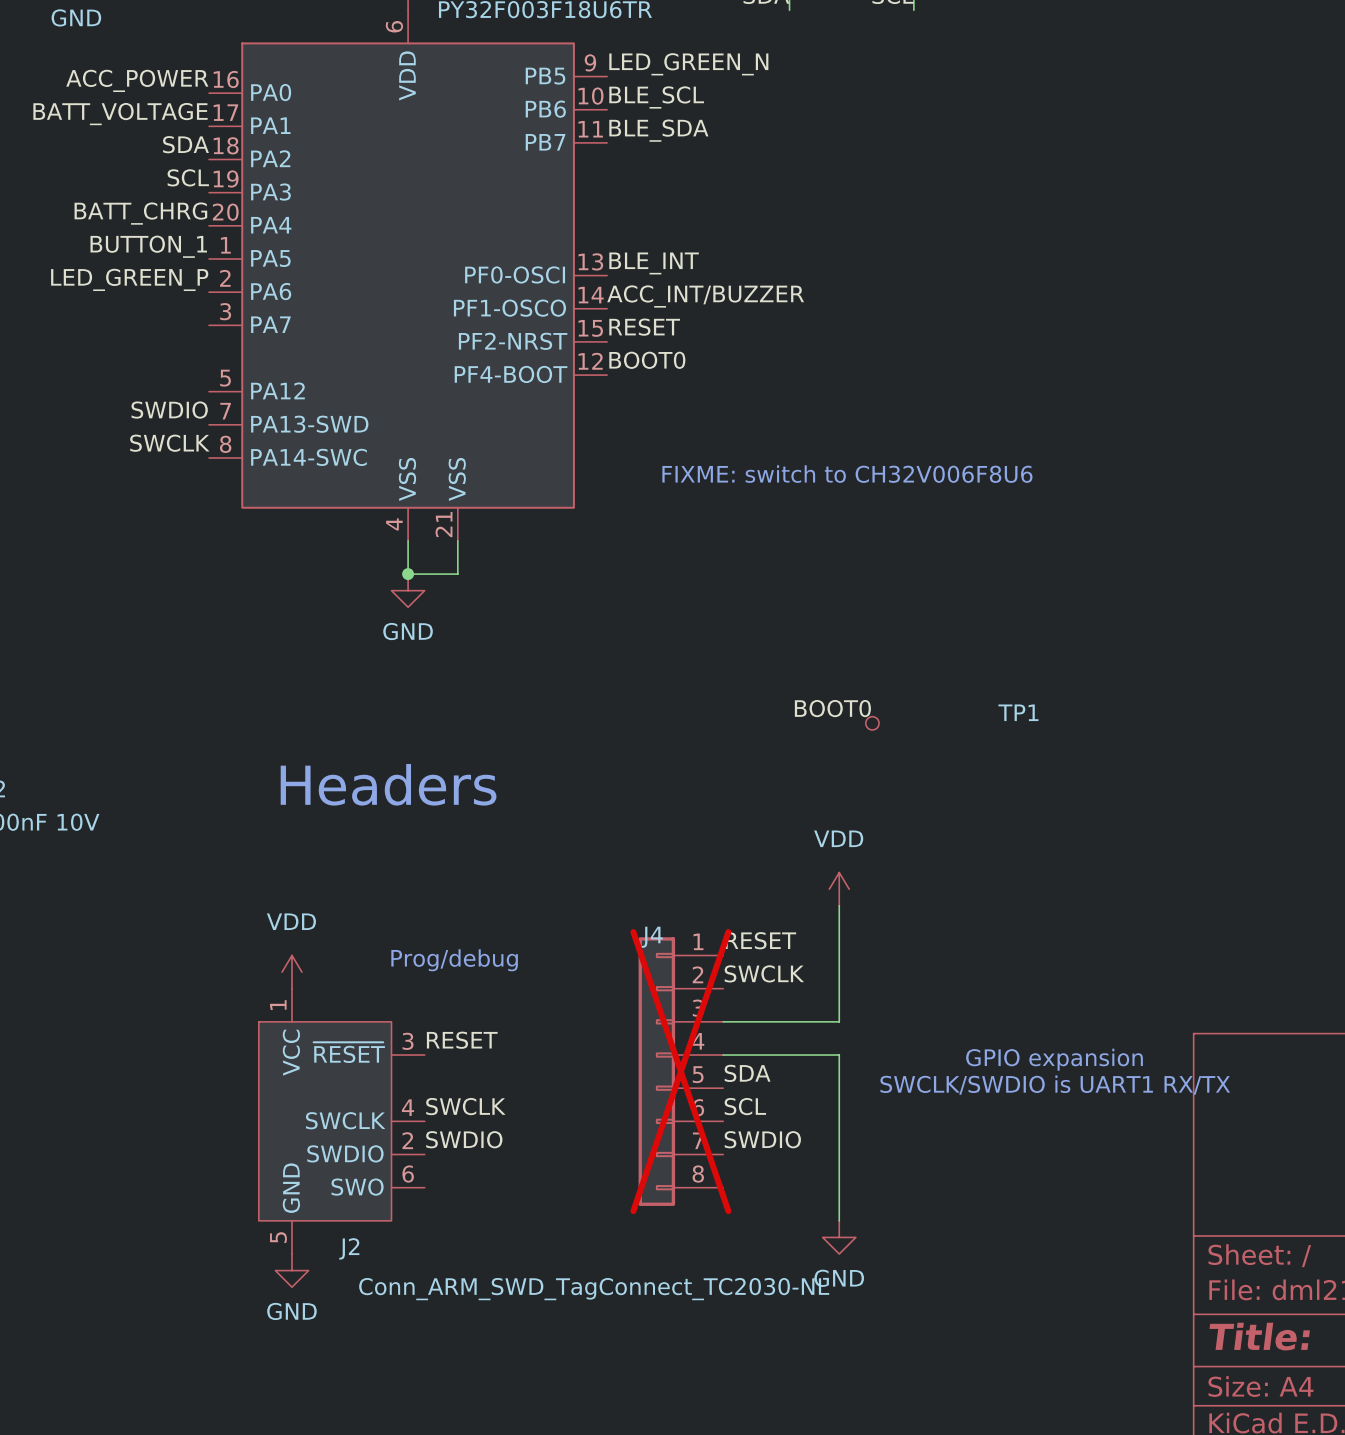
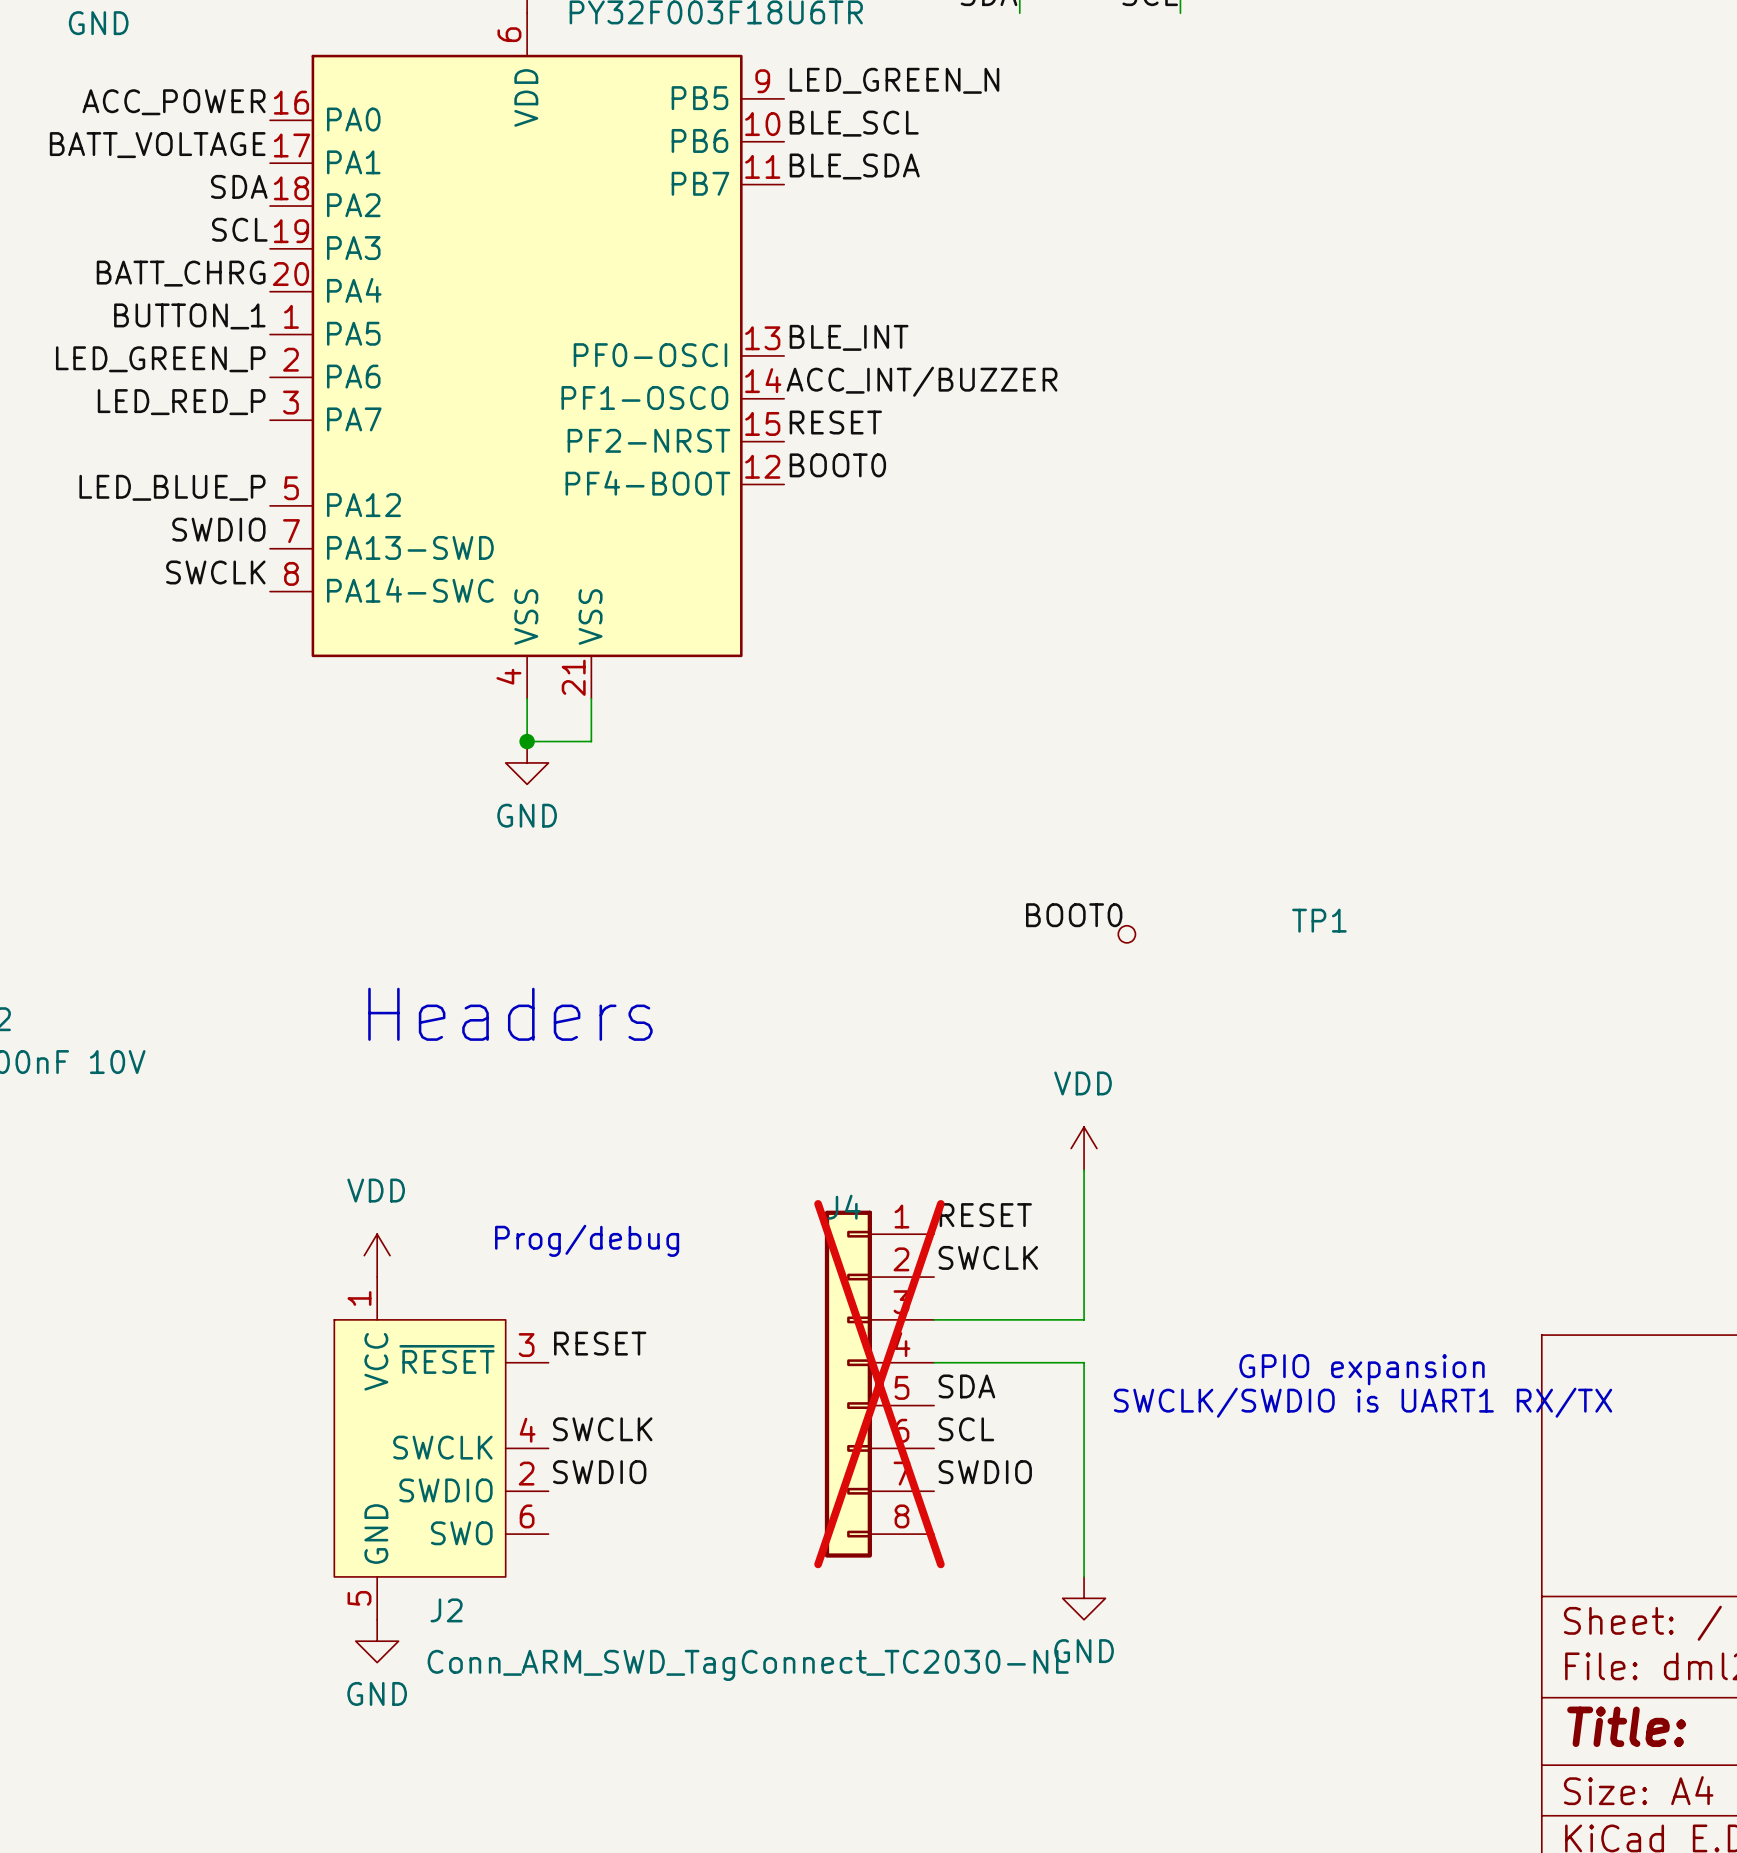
label: none -> LED_RED_P (181, 402)
label: none -> LED_BLUE_P (172, 487)
text: FIXME: switch to CH32V006F8U6 (847, 474) -> none

